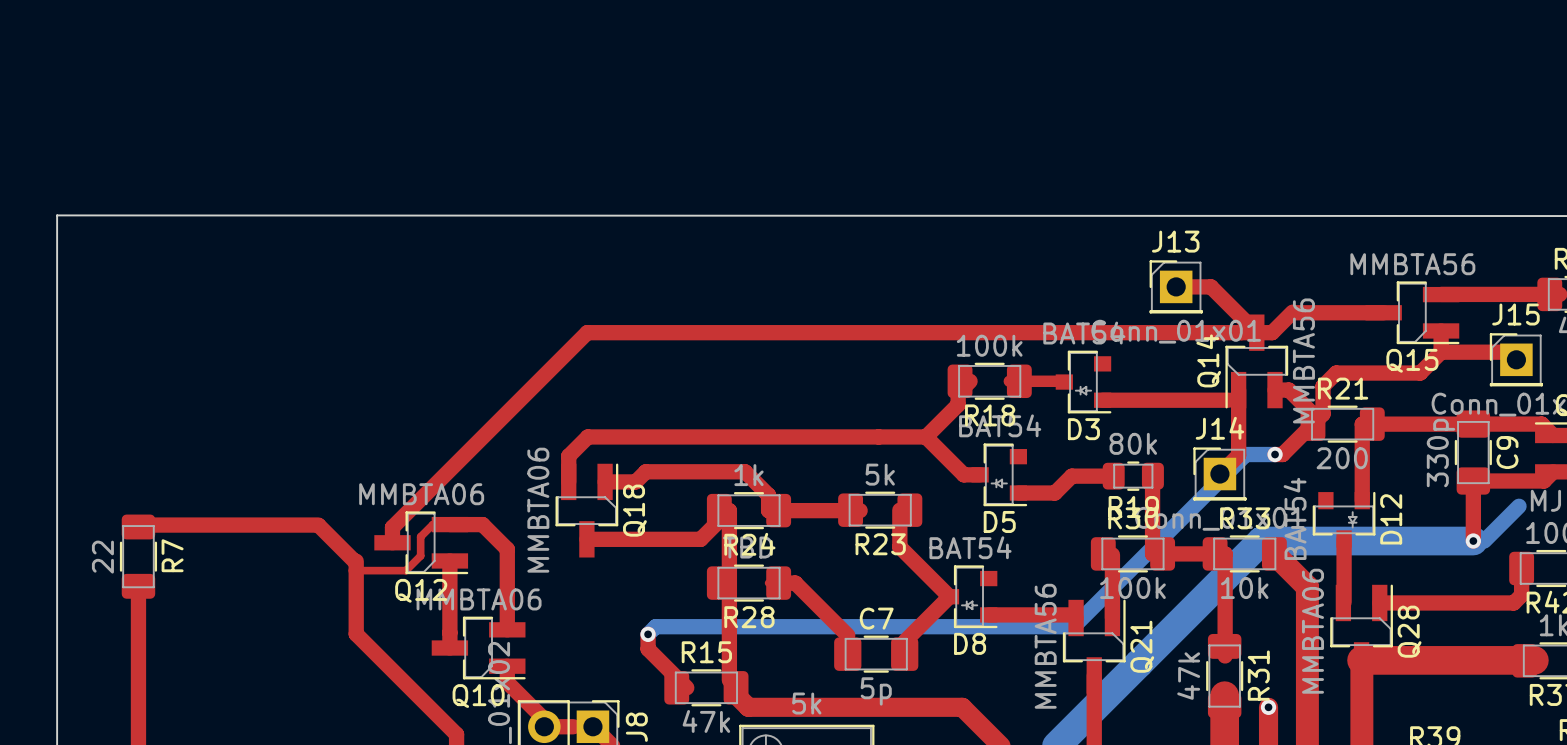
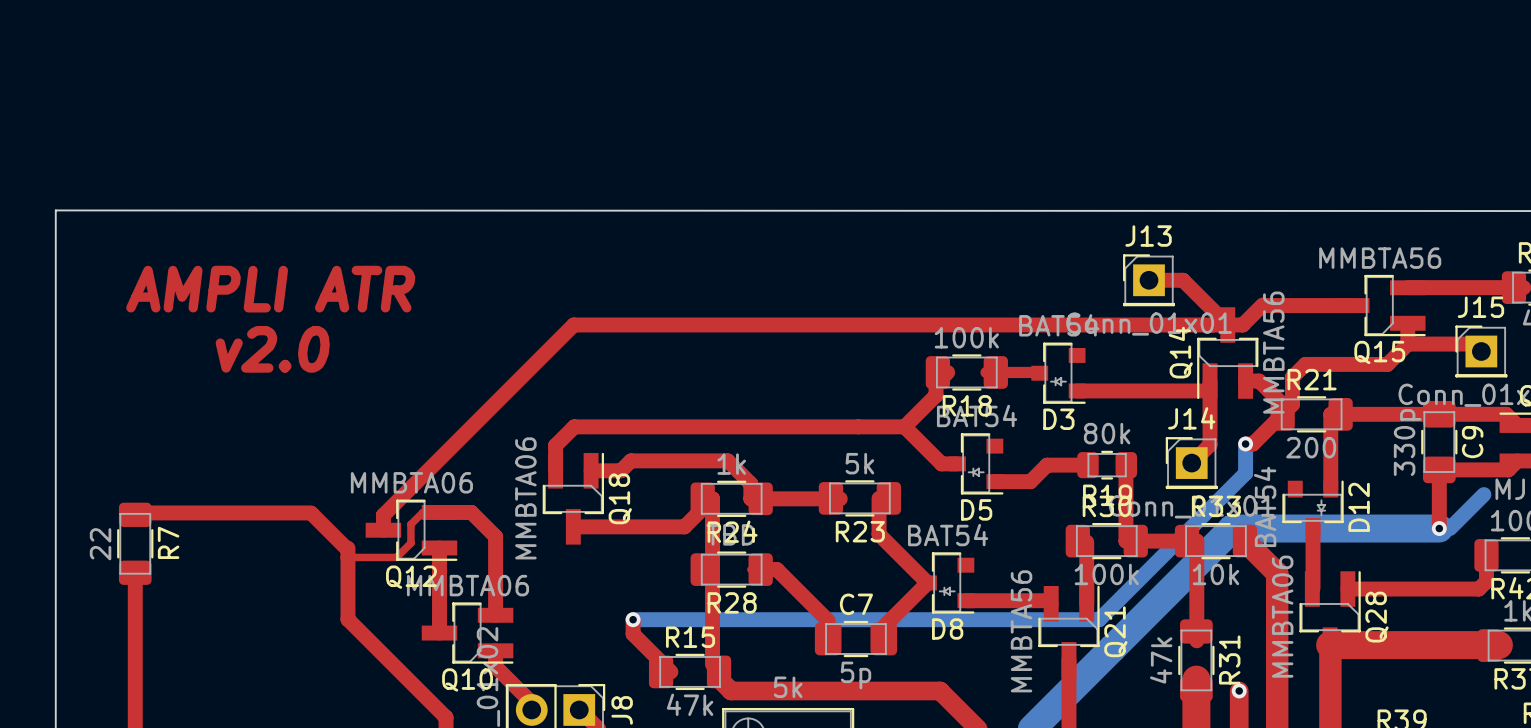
text: none -> AMPLI ATR (270, 289)
text: none -> v2.0 (272, 349)
bottom track: (1275, 454) (1245, 454) (1073, 626) (655, 626) (648, 634) -> (1245, 444) (1245, 473) (1099, 619) (633, 619)
top track: (551, 726) (573, 726) -> none

